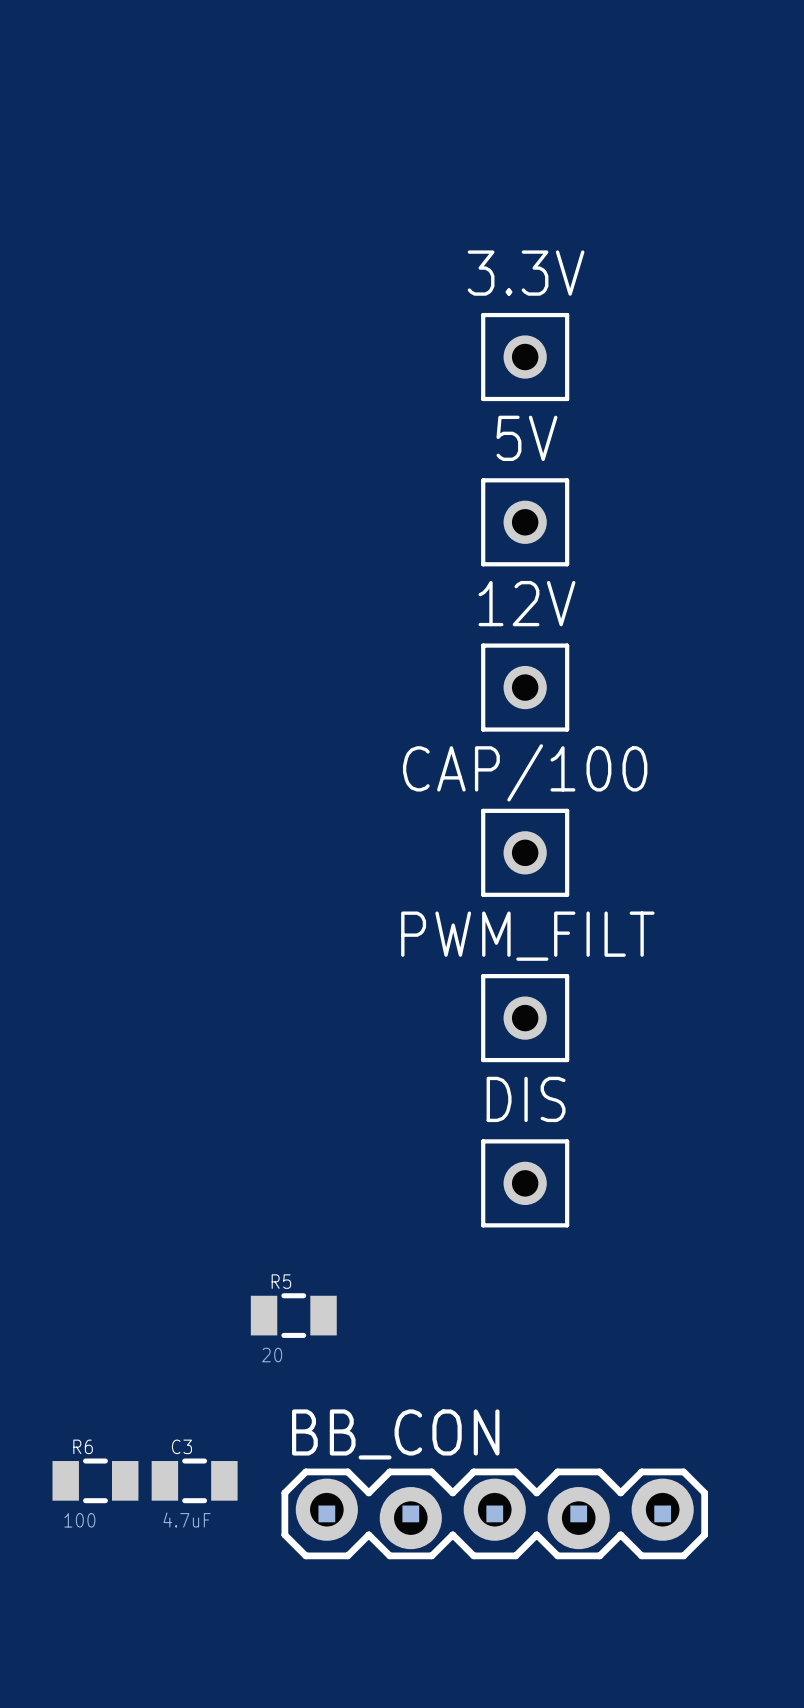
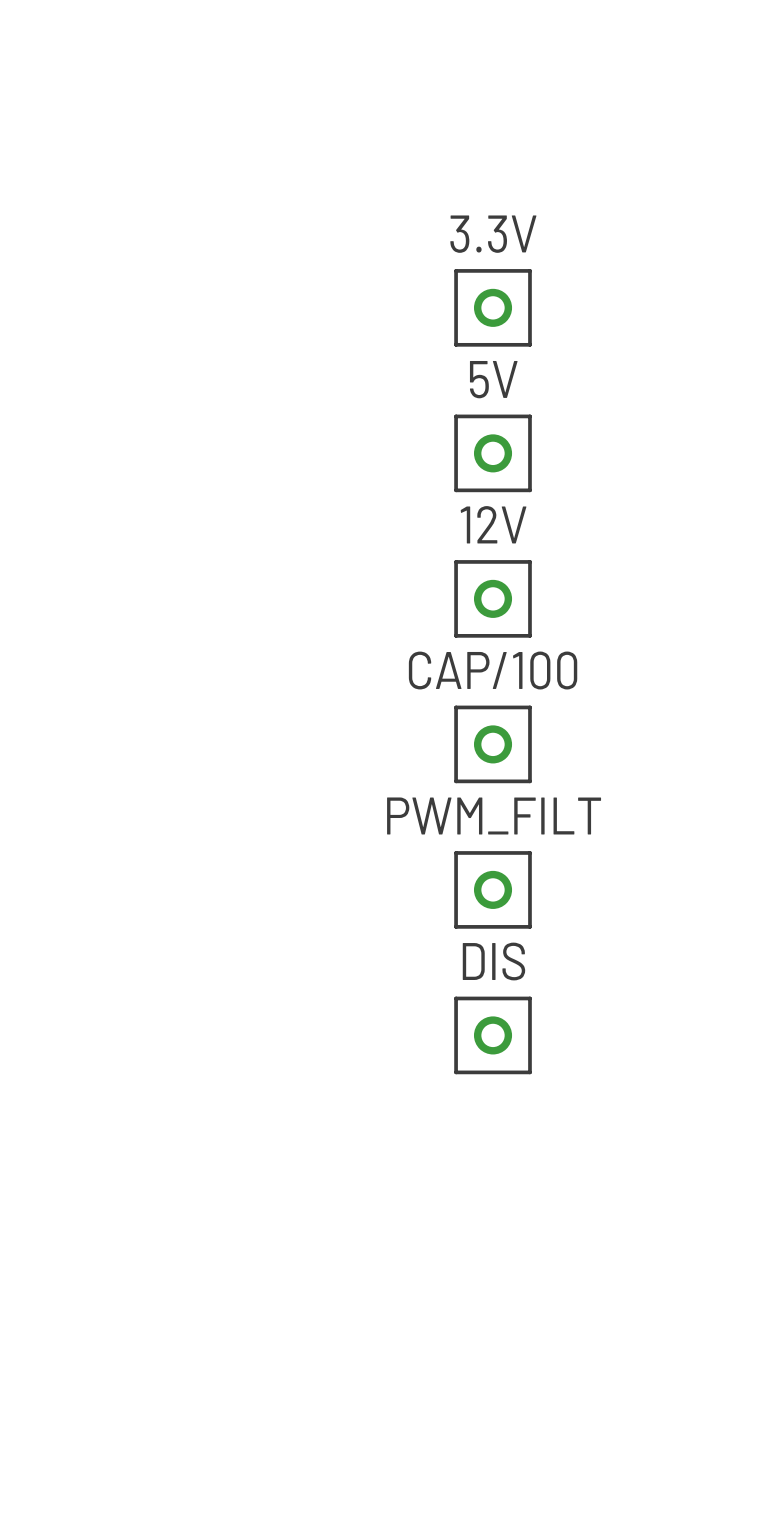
R5: 20 (293, 1315) -> none
R6: 100 (95, 1480) -> none
C3: 4.7uF (194, 1480) -> none
BB_CON: (494, 1513) -> none

